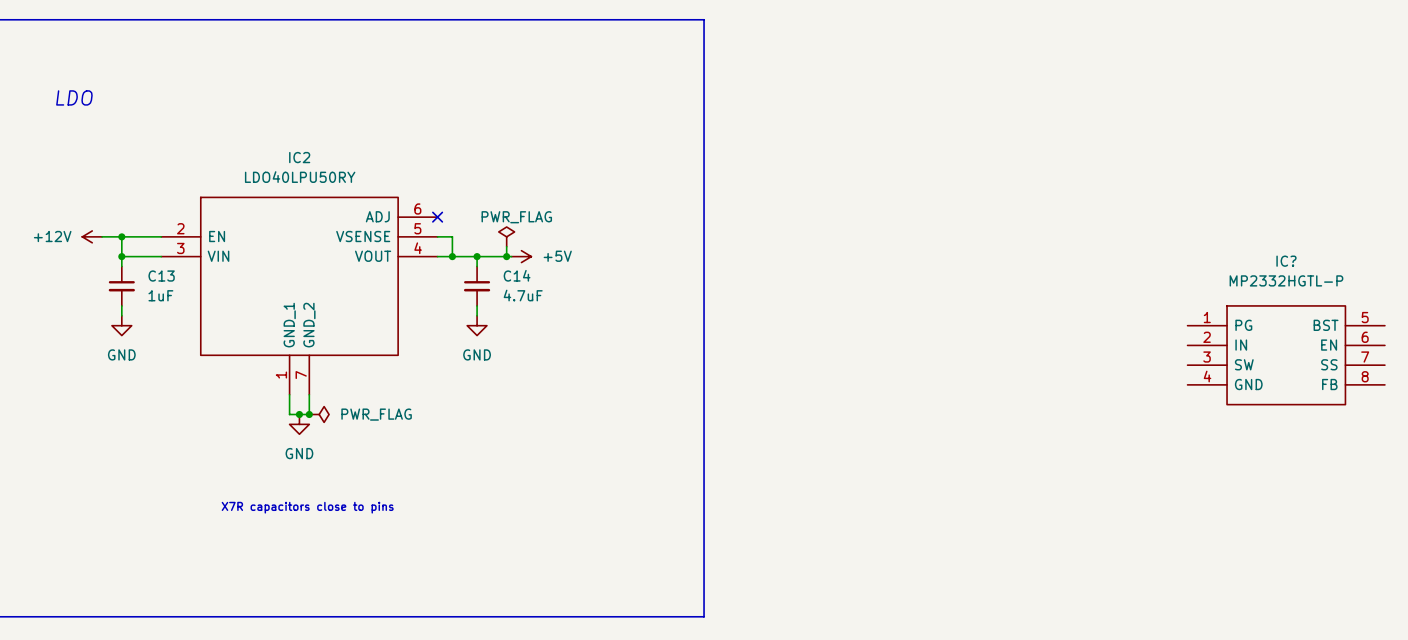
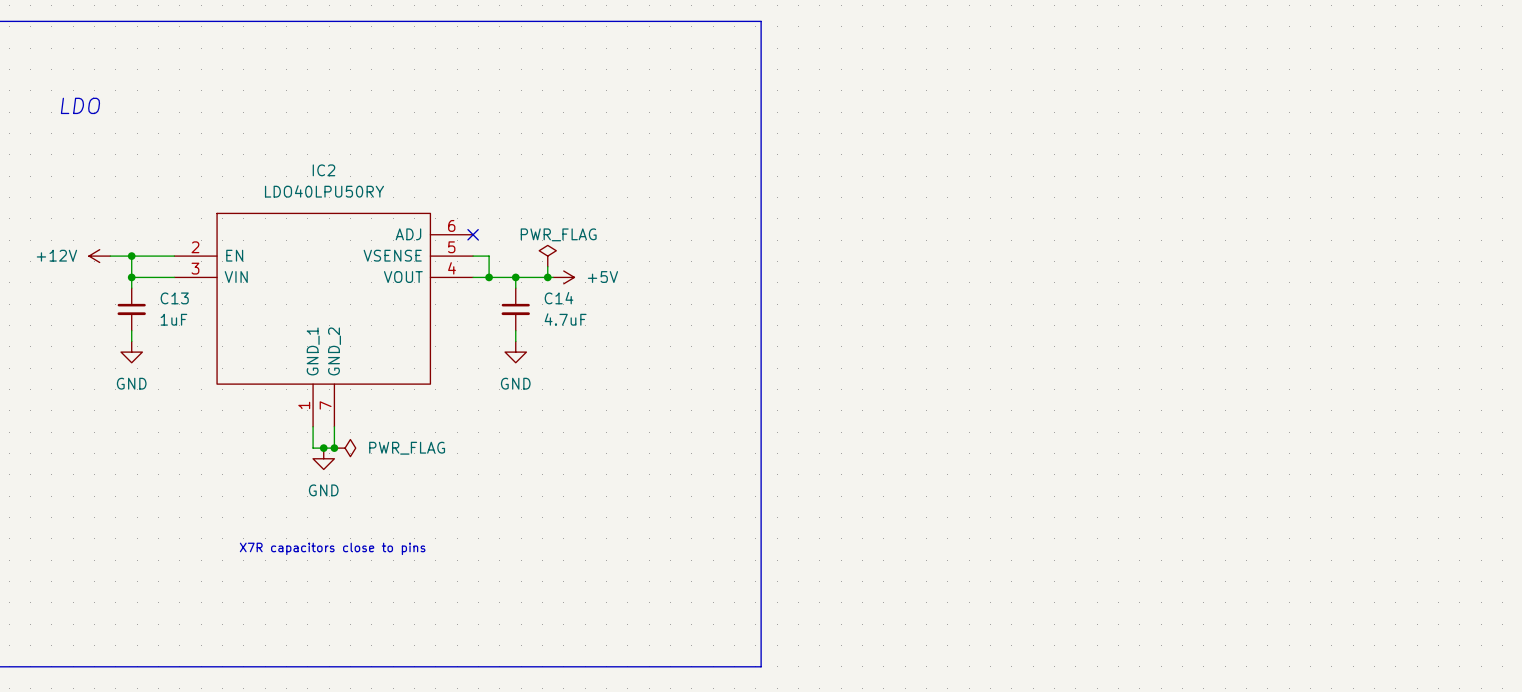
IC?: MP2332HGTL-P (1286, 355) -> none

